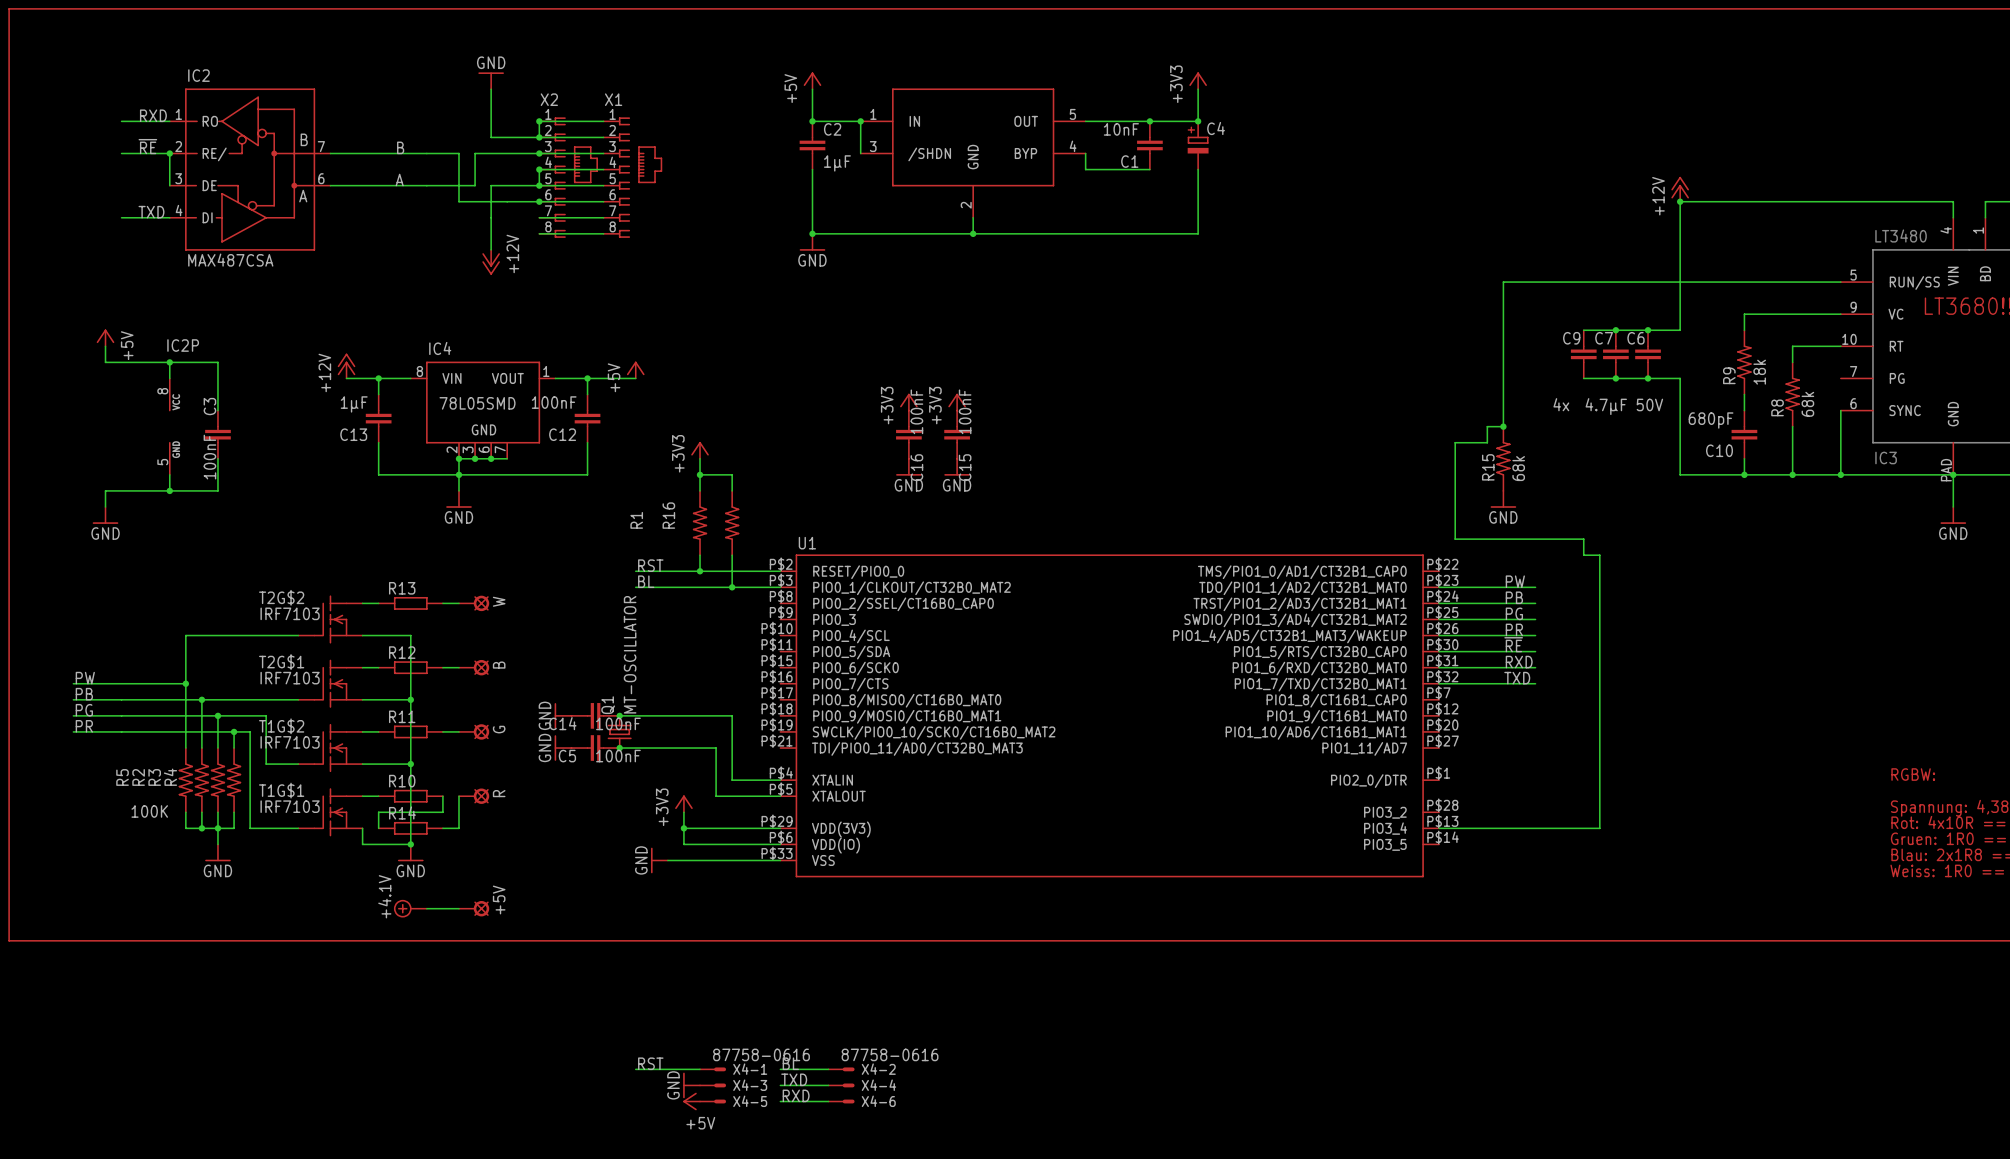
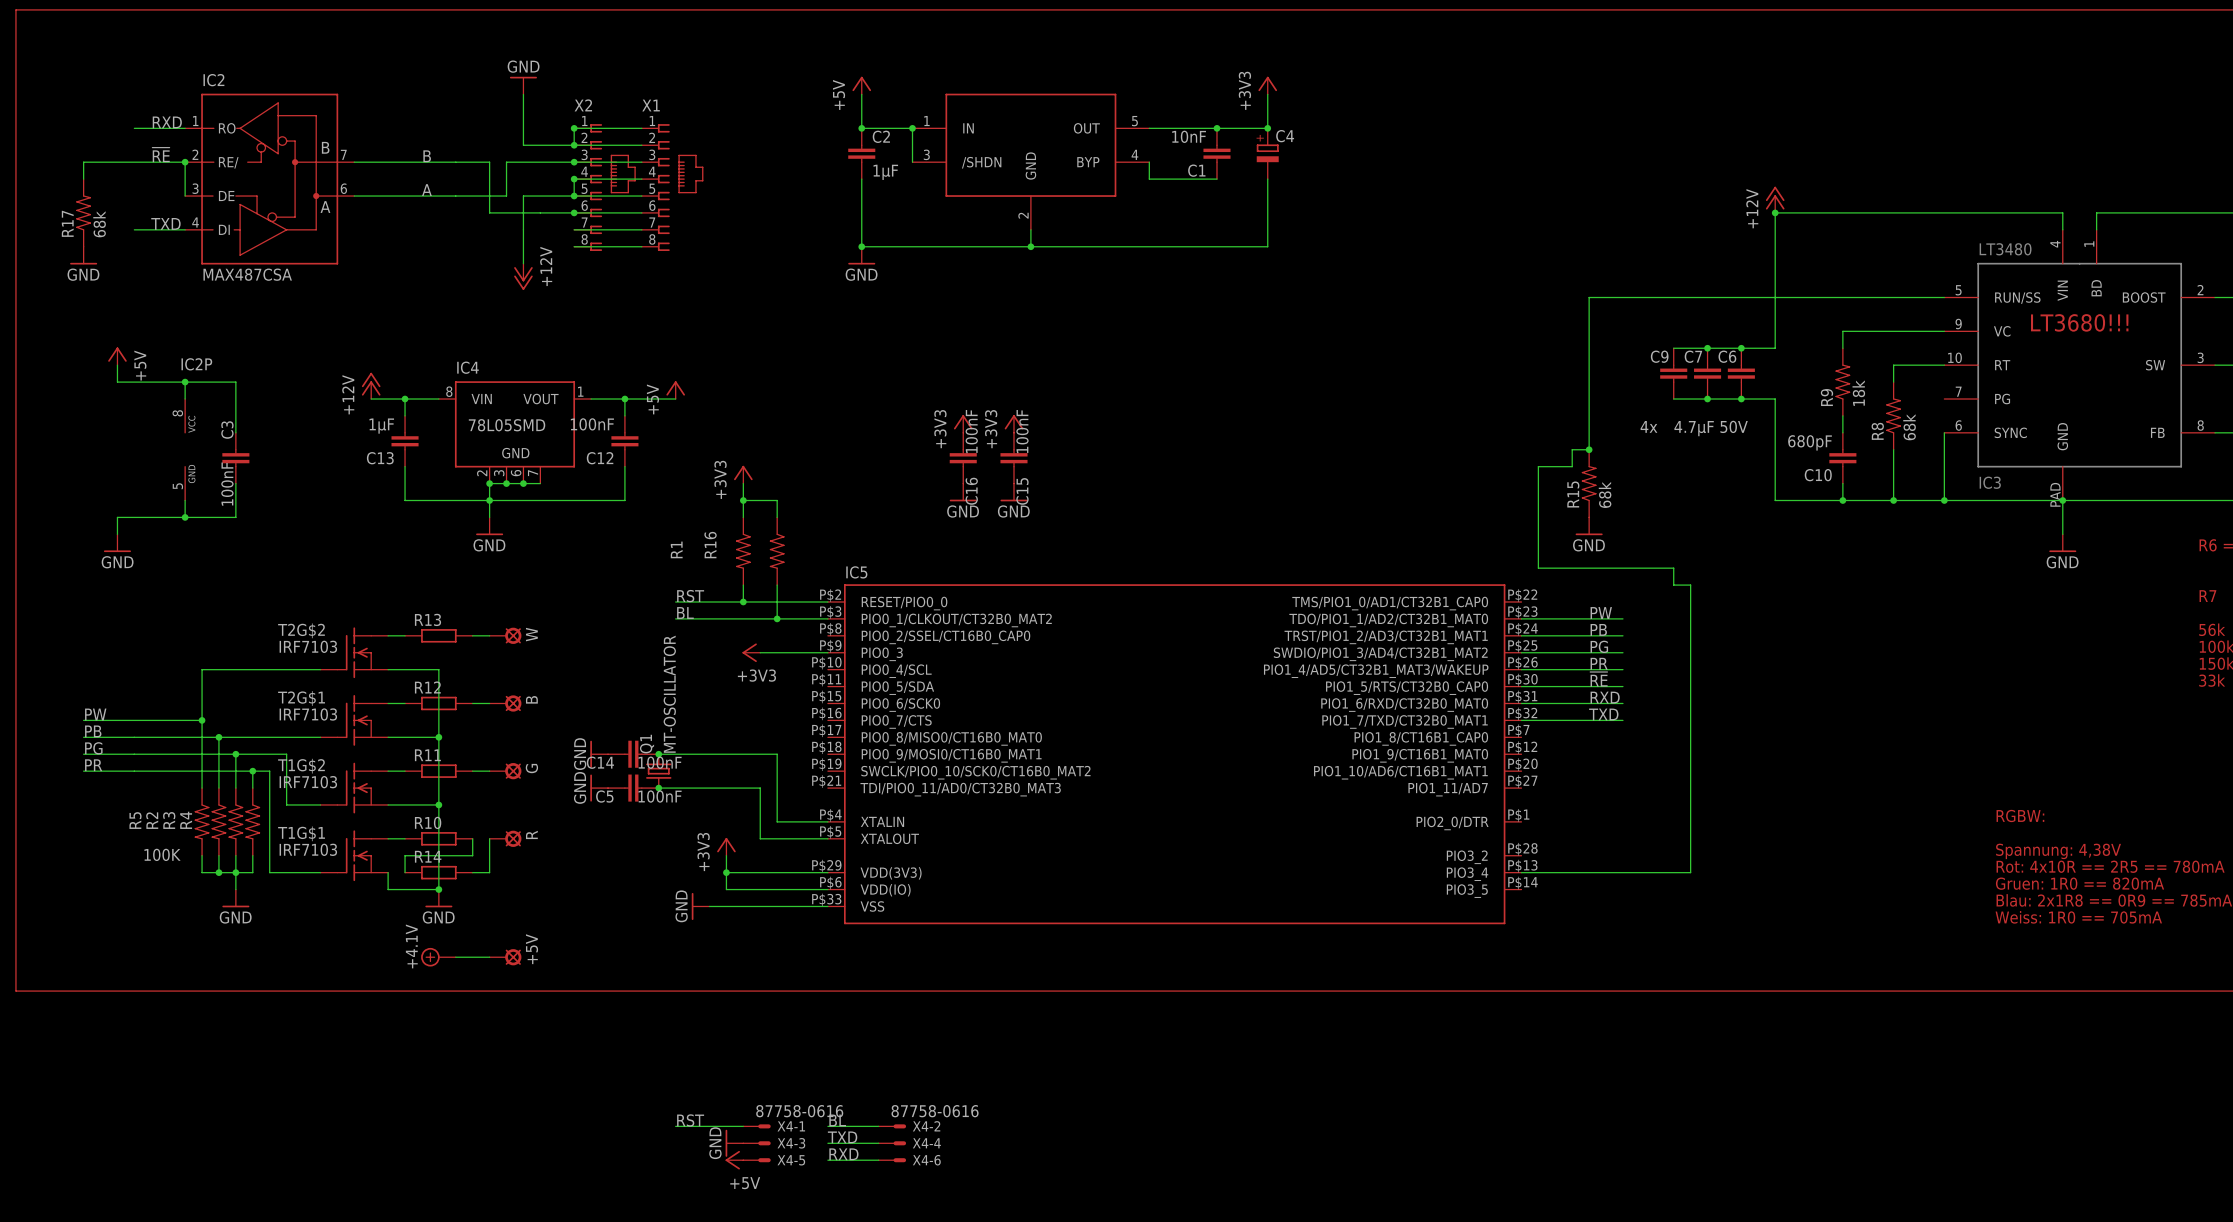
wire: none -> (134, 162) (83, 162) (83, 179)
R17: none -> 68k (83, 212)
power symbol: none -> GND (83, 255)
U1 name: U1 (807, 543) -> IC5 (856, 572)
power symbol: none -> +3V3 (751, 652)
wire: none -> (760, 652) (827, 652)

